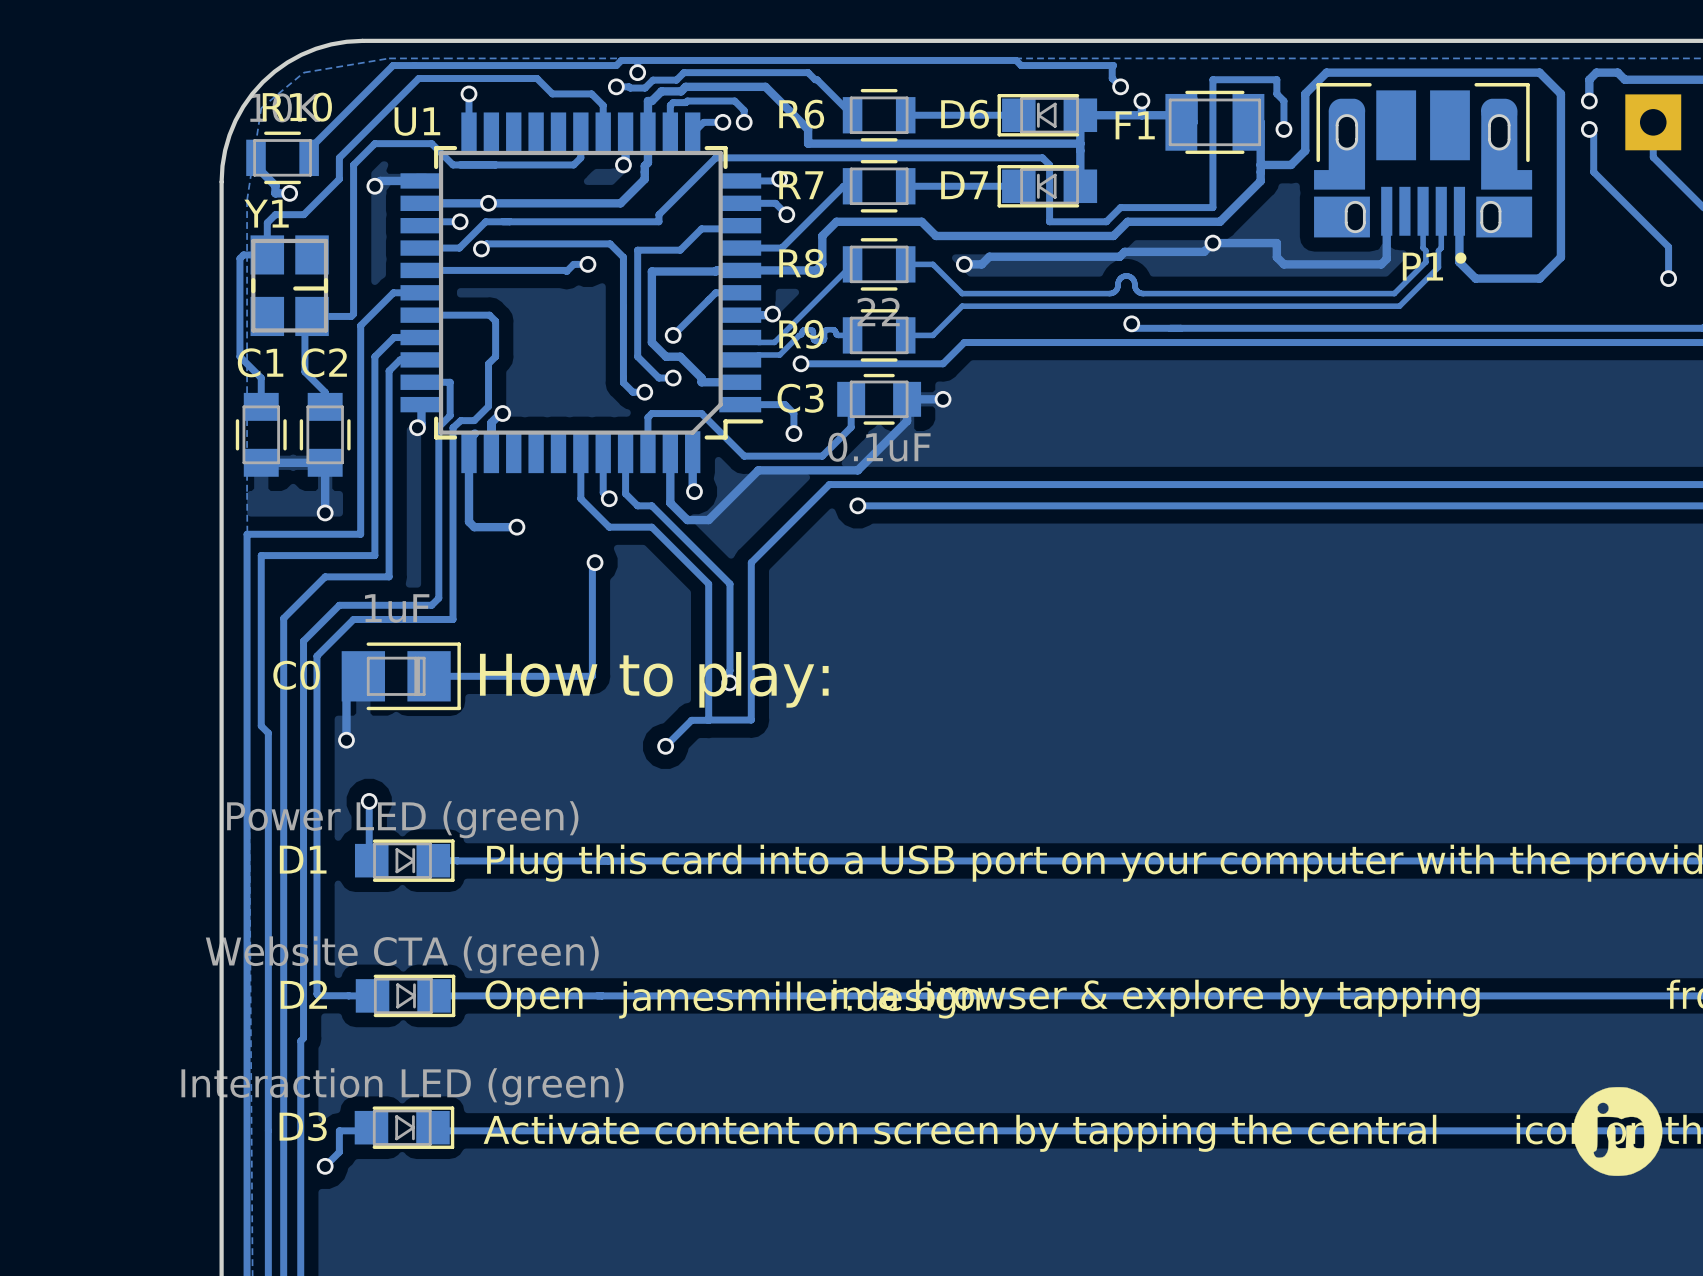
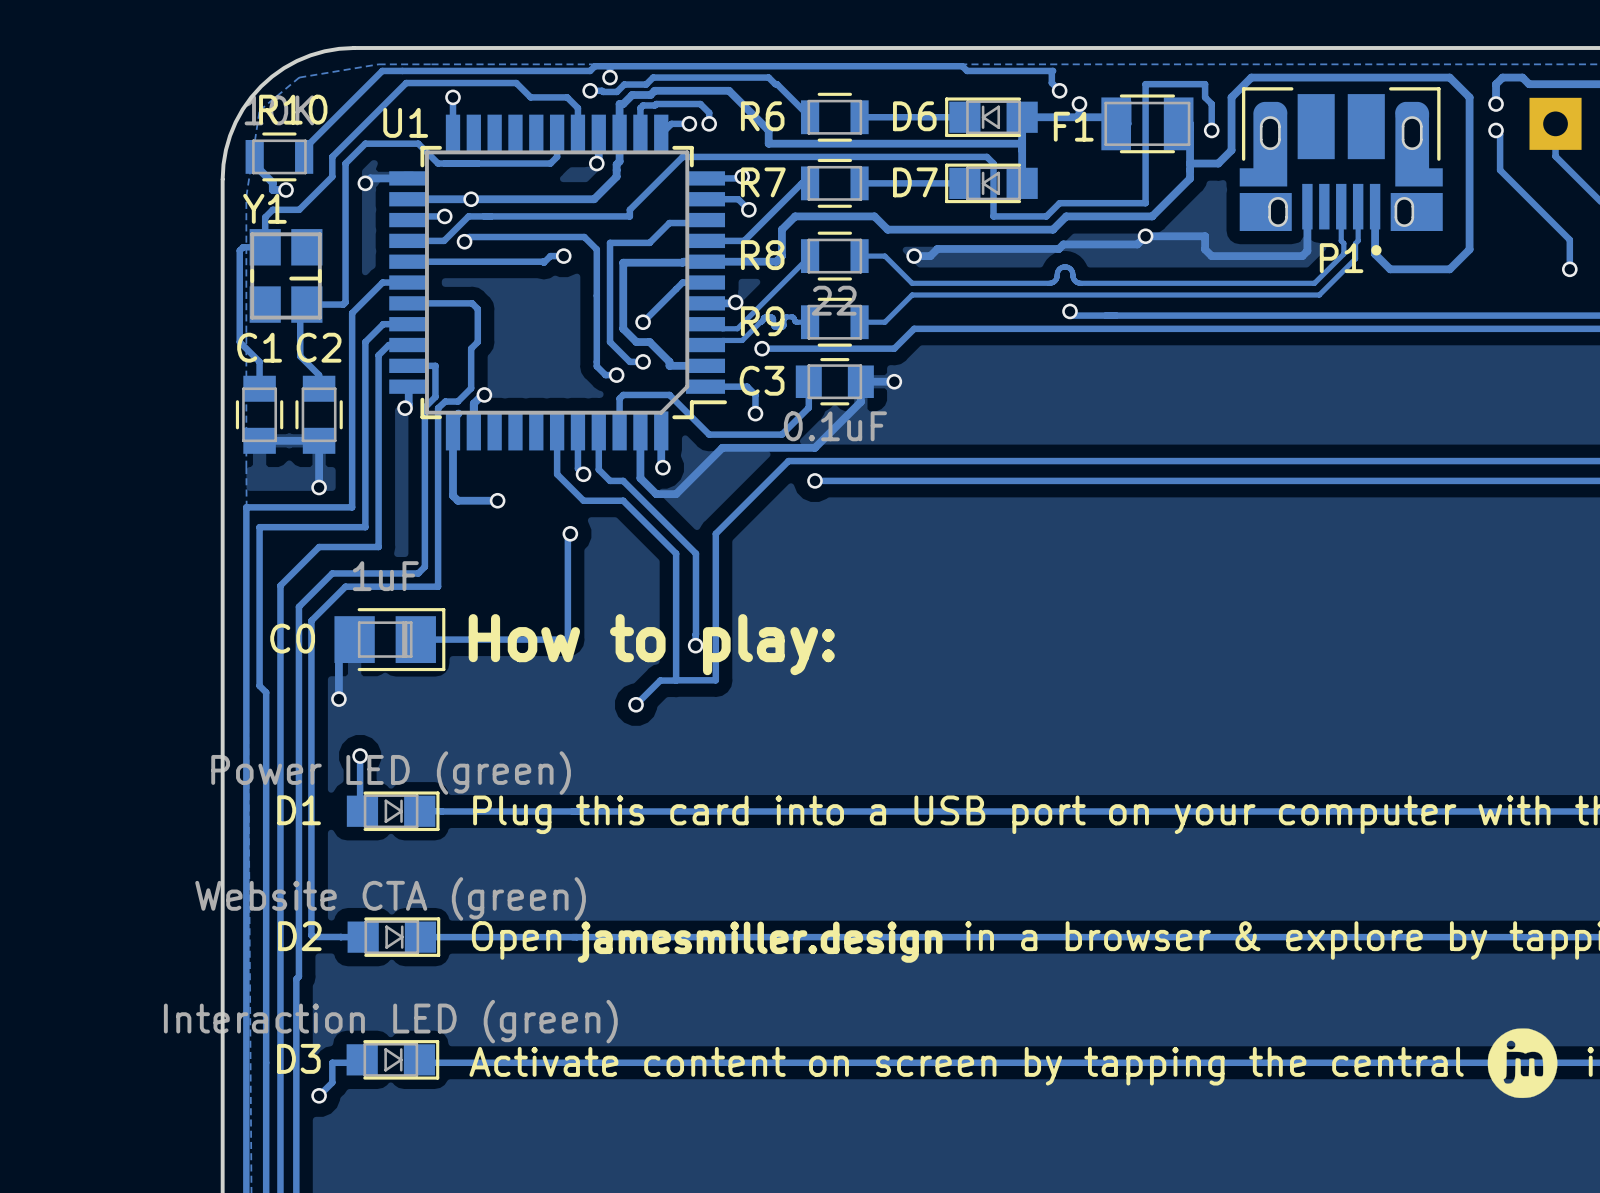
drawing shape: [1573, 1087, 1663, 1176] -> [1487, 1028, 1558, 1099]

